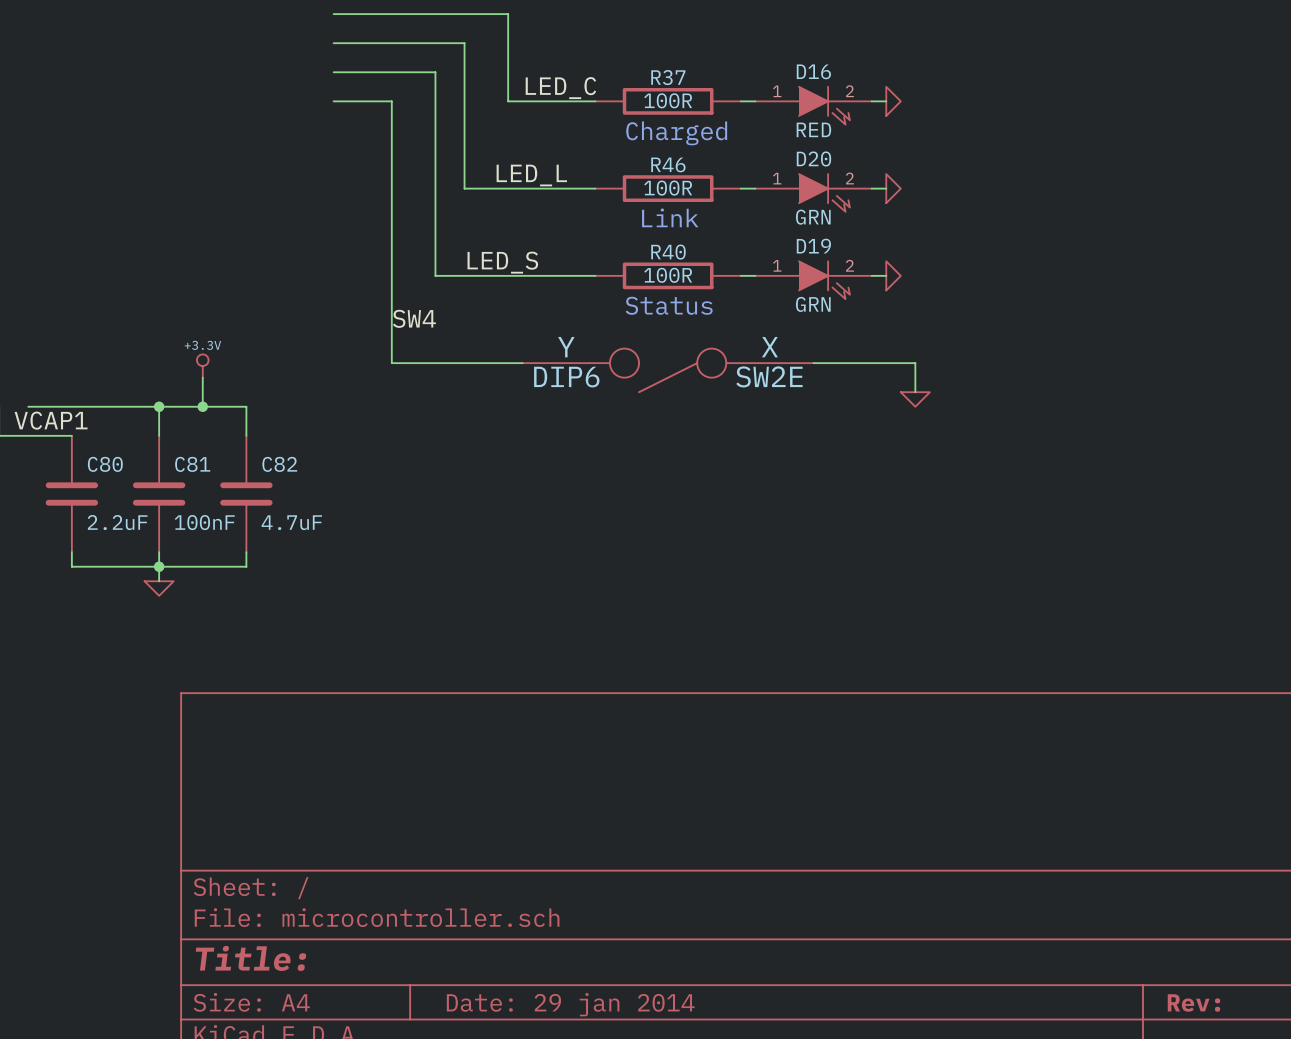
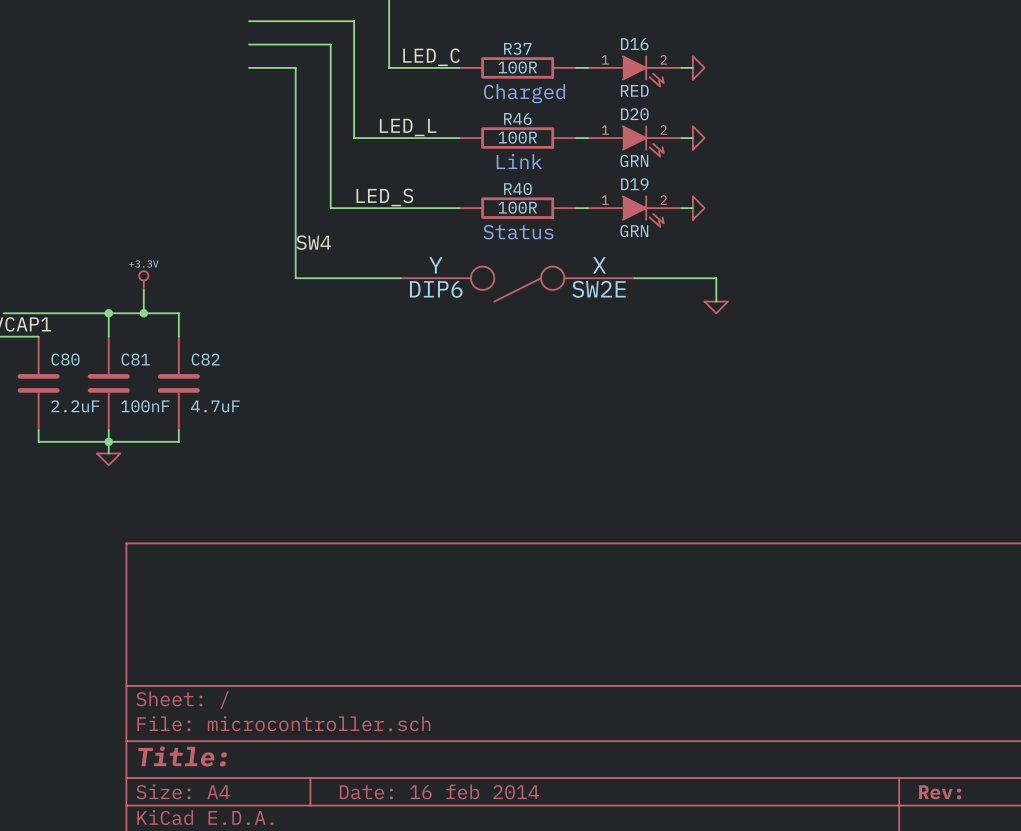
title block: Date: 29 jan 2014 (570, 1004) -> Date: 16 feb 2014 (439, 791)

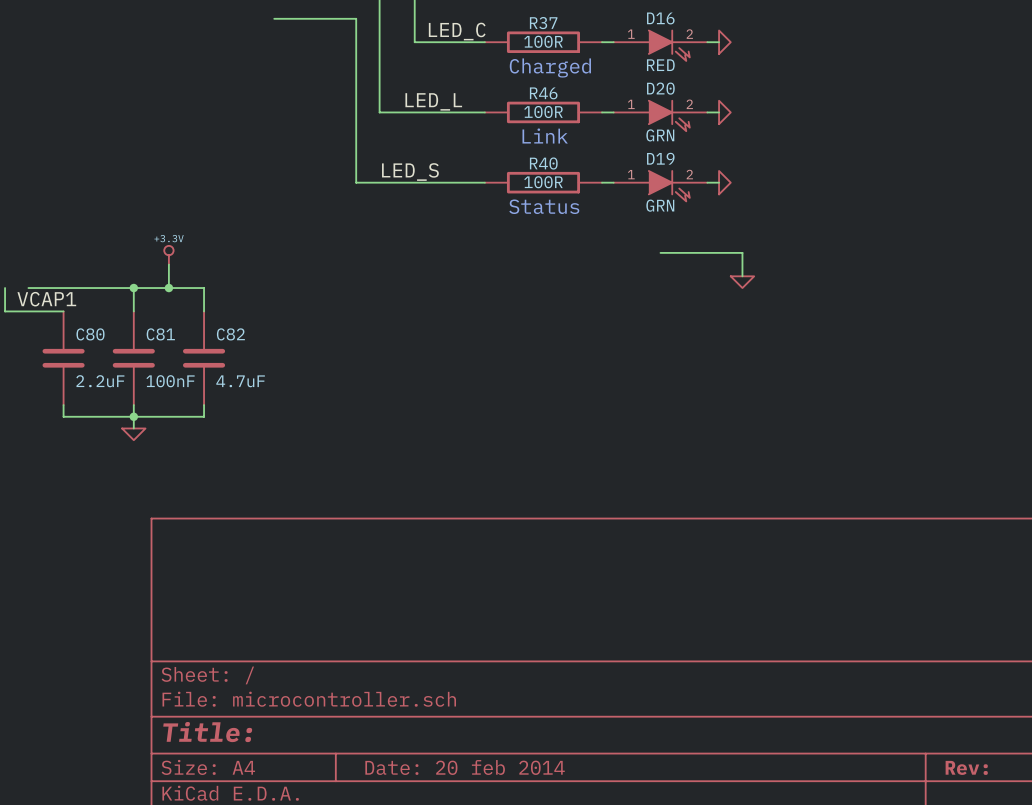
wire: (248, 67) (295, 67) (295, 278) (400, 278) -> none
label: SW4 (313, 242) -> none
SW2E: DIP6 (517, 284) -> none
title block: Date: 16 feb 2014 (439, 791) -> Date: 20 feb 2014 (465, 767)

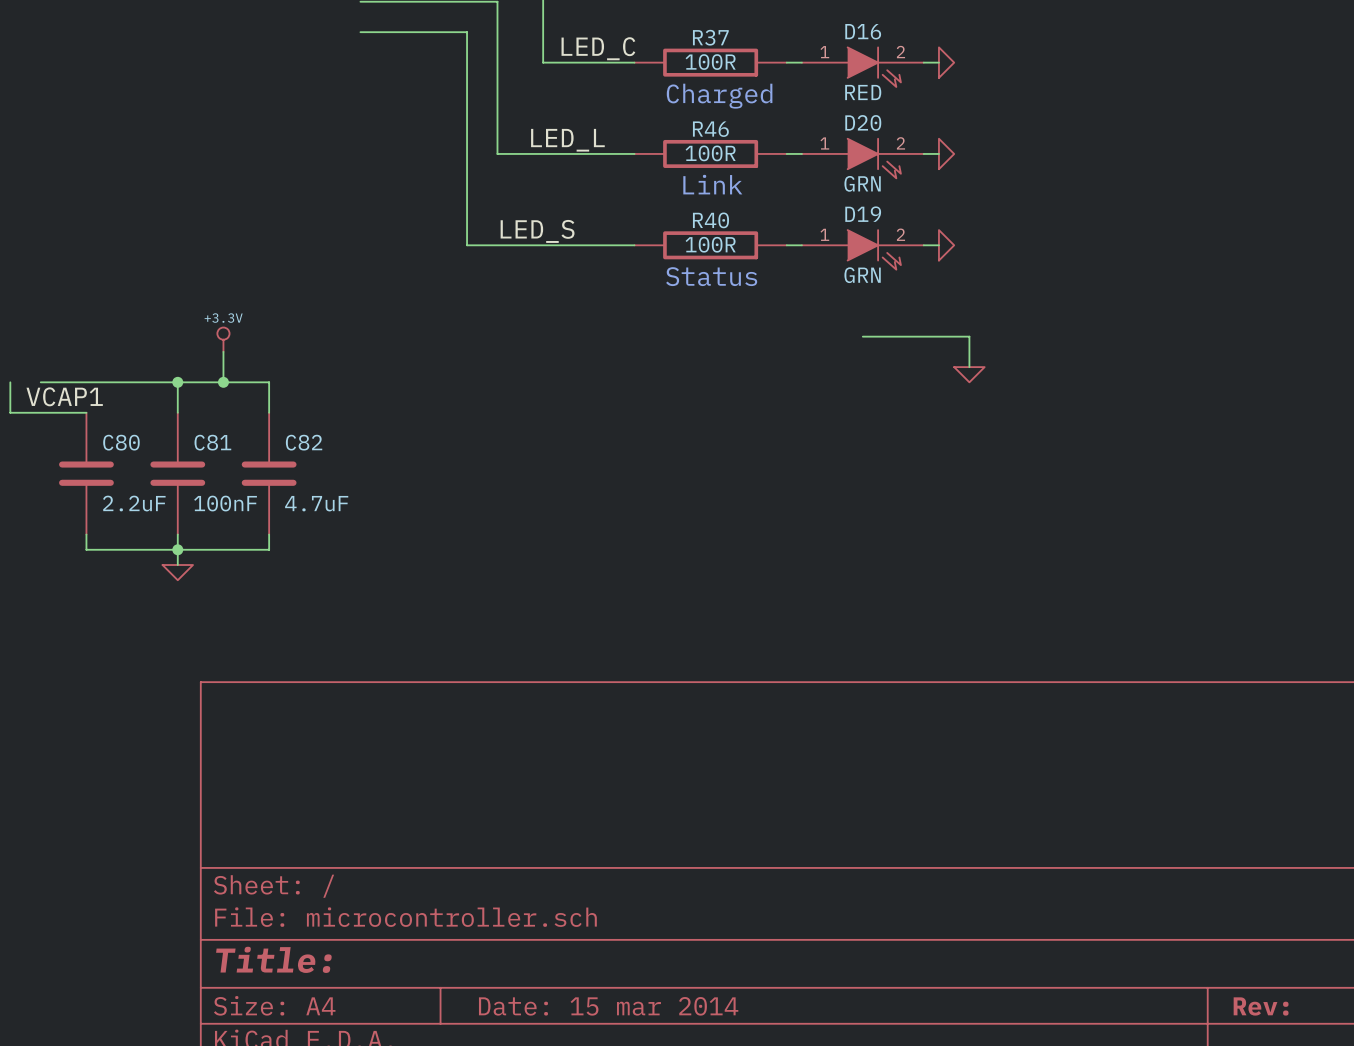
title block: Date: 20 feb 2014 (465, 767) -> Date: 15 mar 2014 (608, 1006)

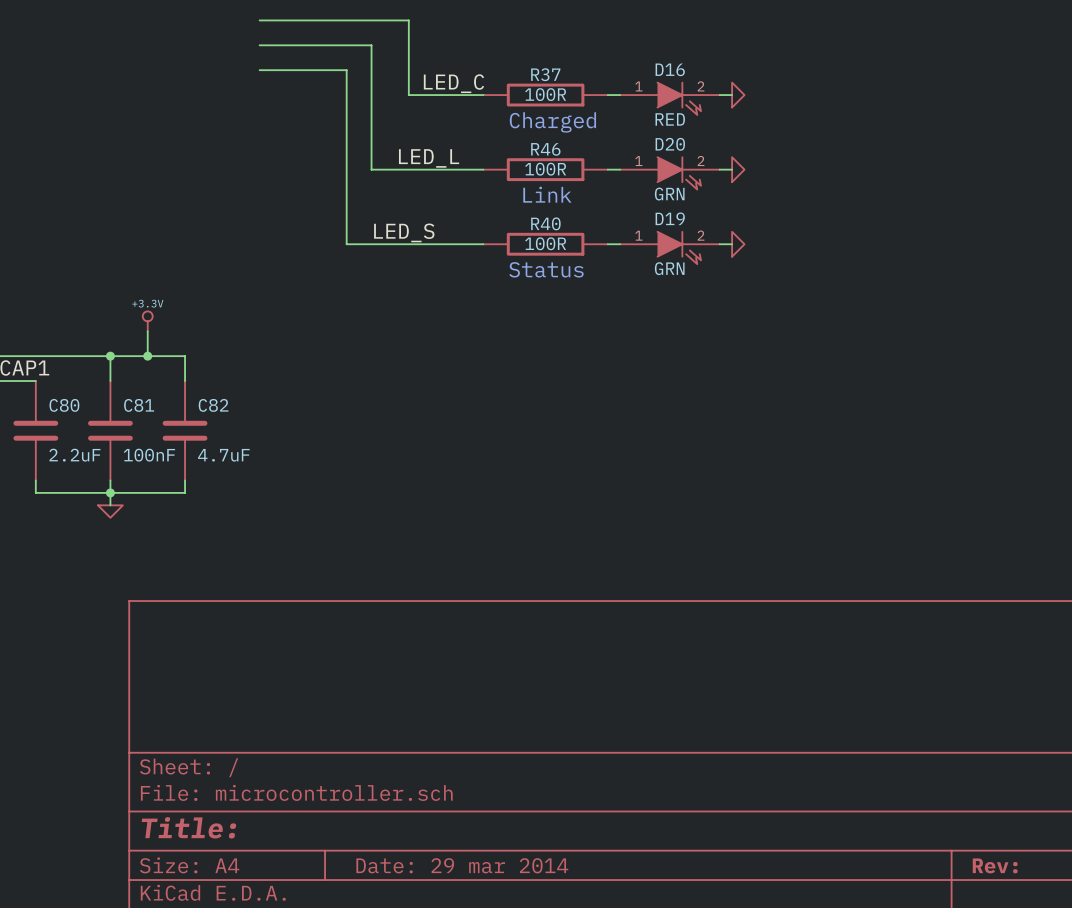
wire: (862, 336) (969, 336) (969, 367) -> none
power symbol: (969, 374) -> none
title block: Date: 15 mar 2014 (608, 1006) -> Date: 29 mar 2014 (462, 865)

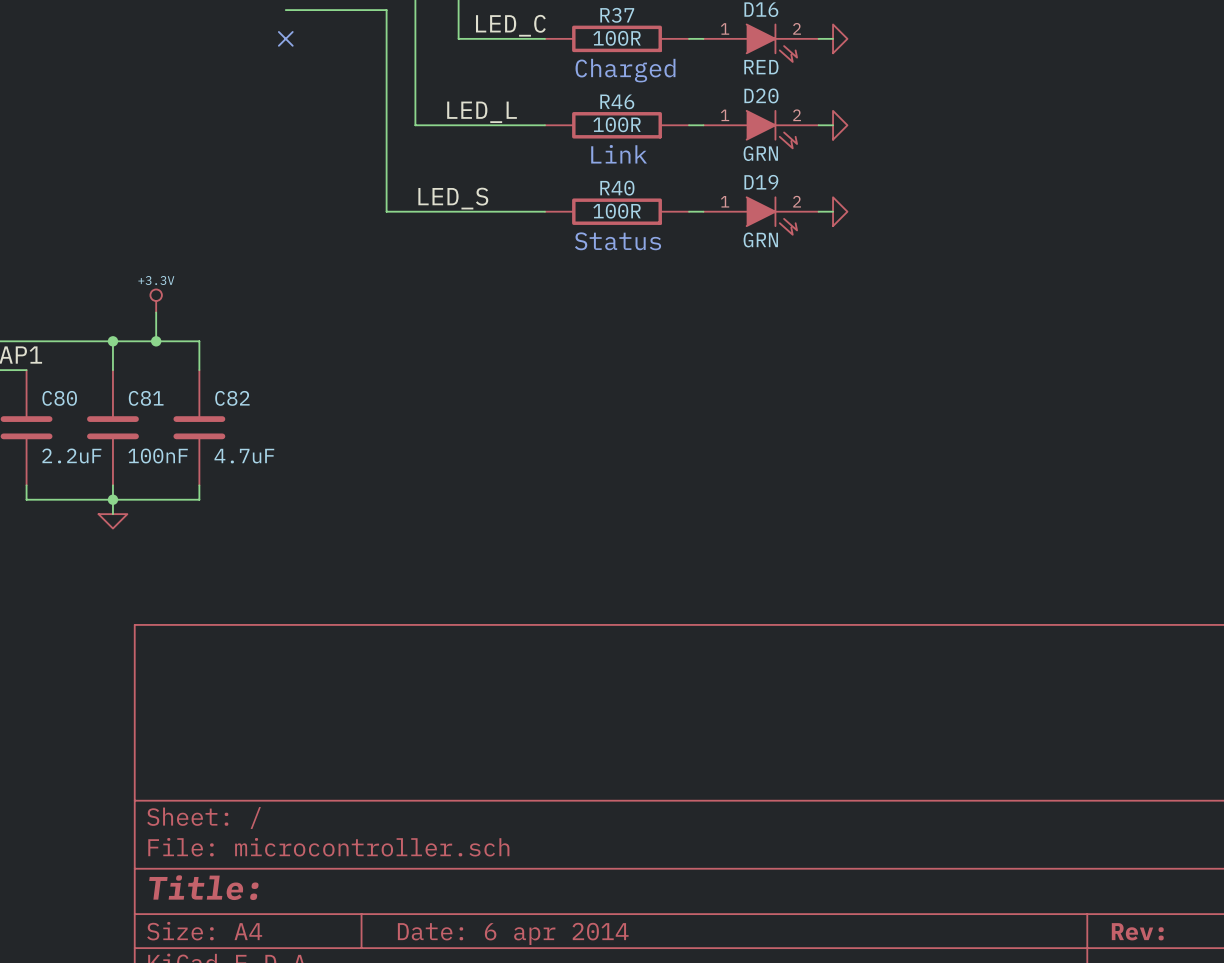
no-connect mark: none -> (285, 38)
title block: Date: 29 mar 2014 (462, 865) -> Date: 6 apr 2014 (513, 933)

